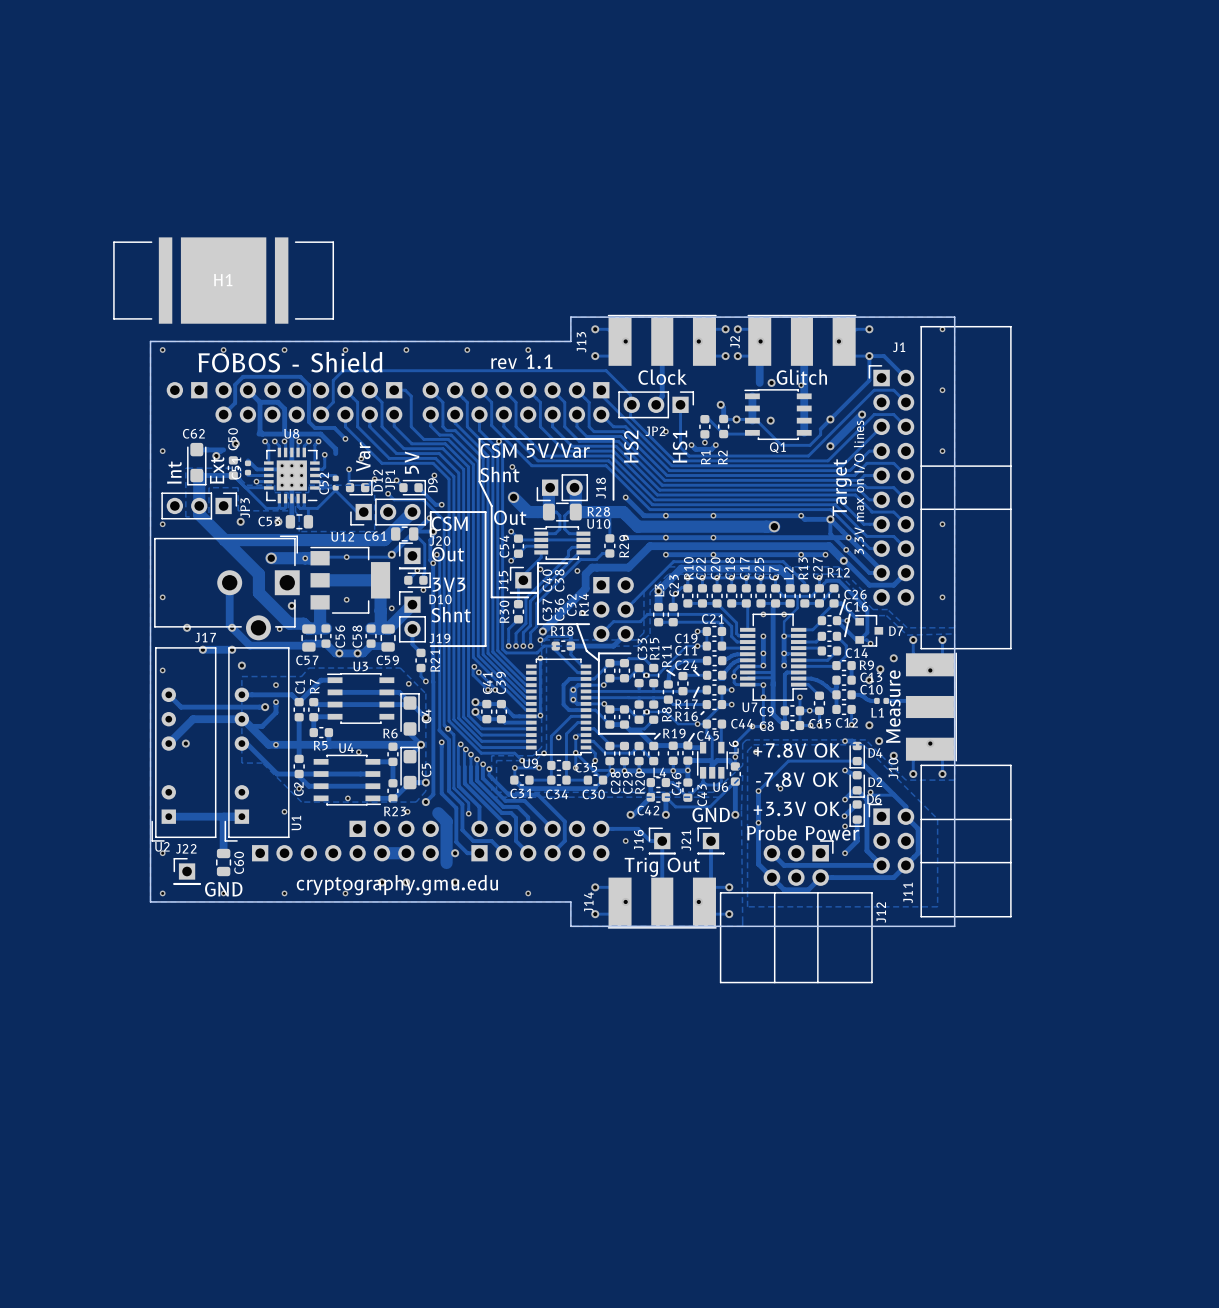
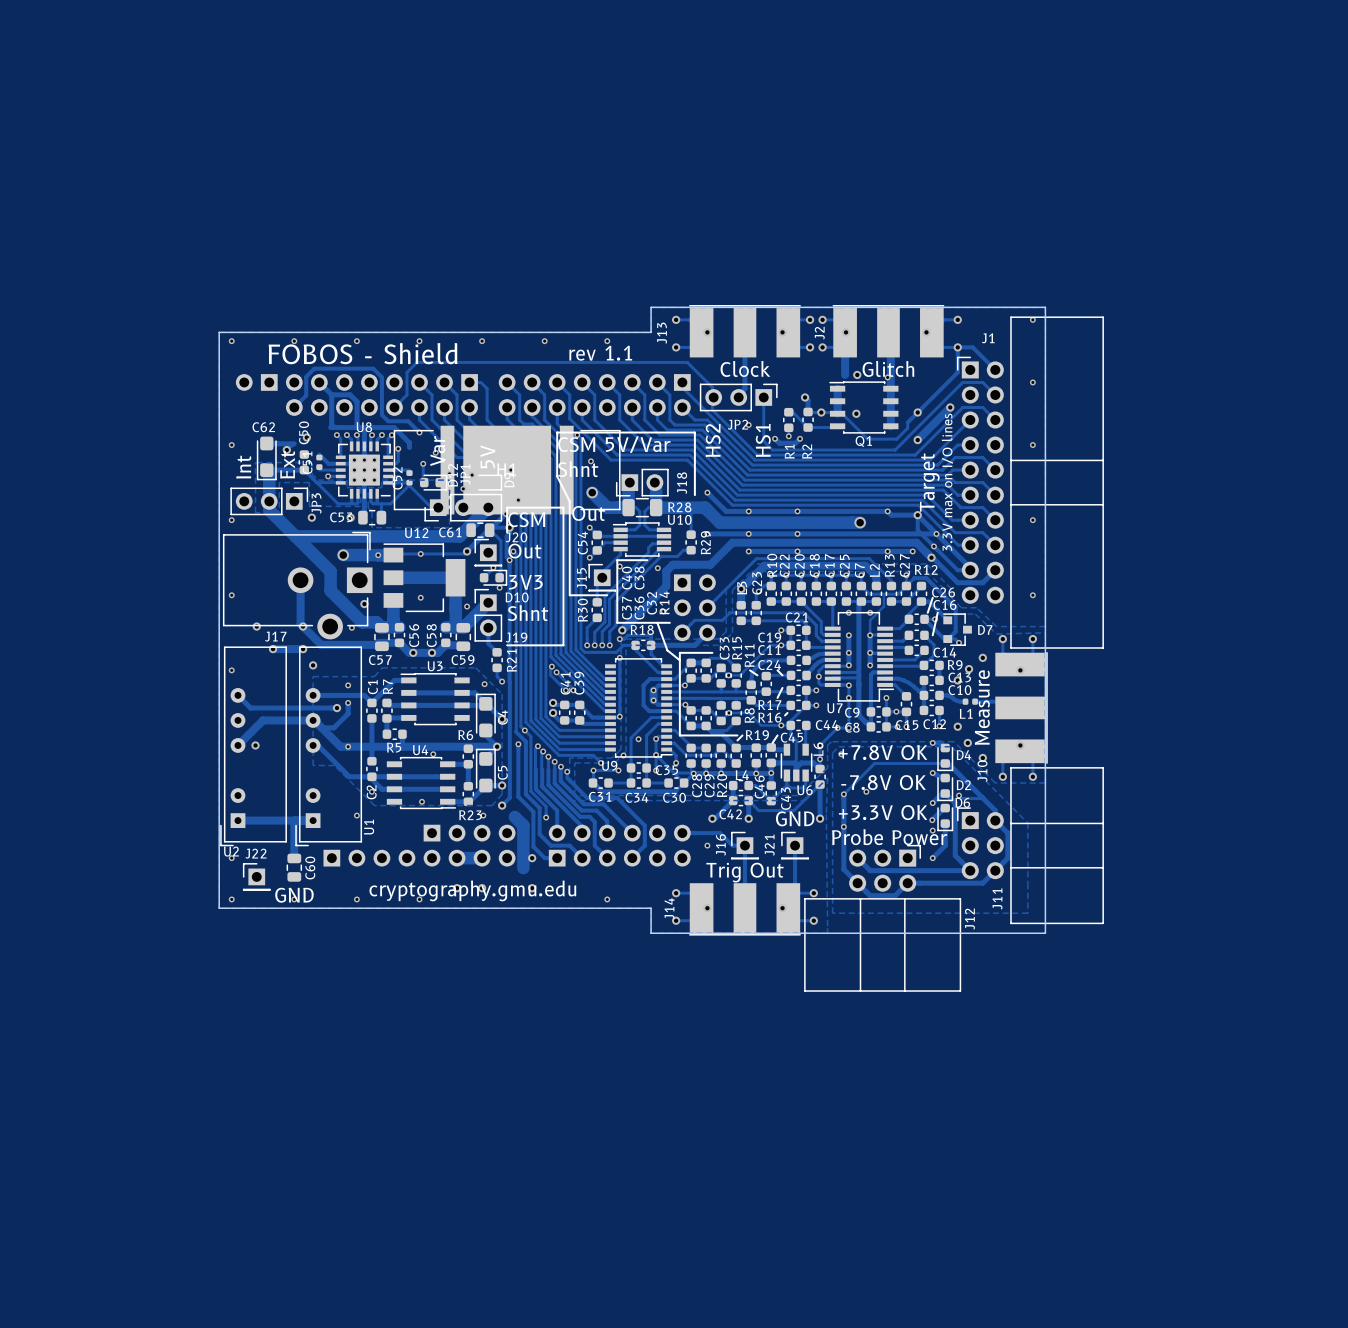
part position: (223, 280) -> (507, 470)

